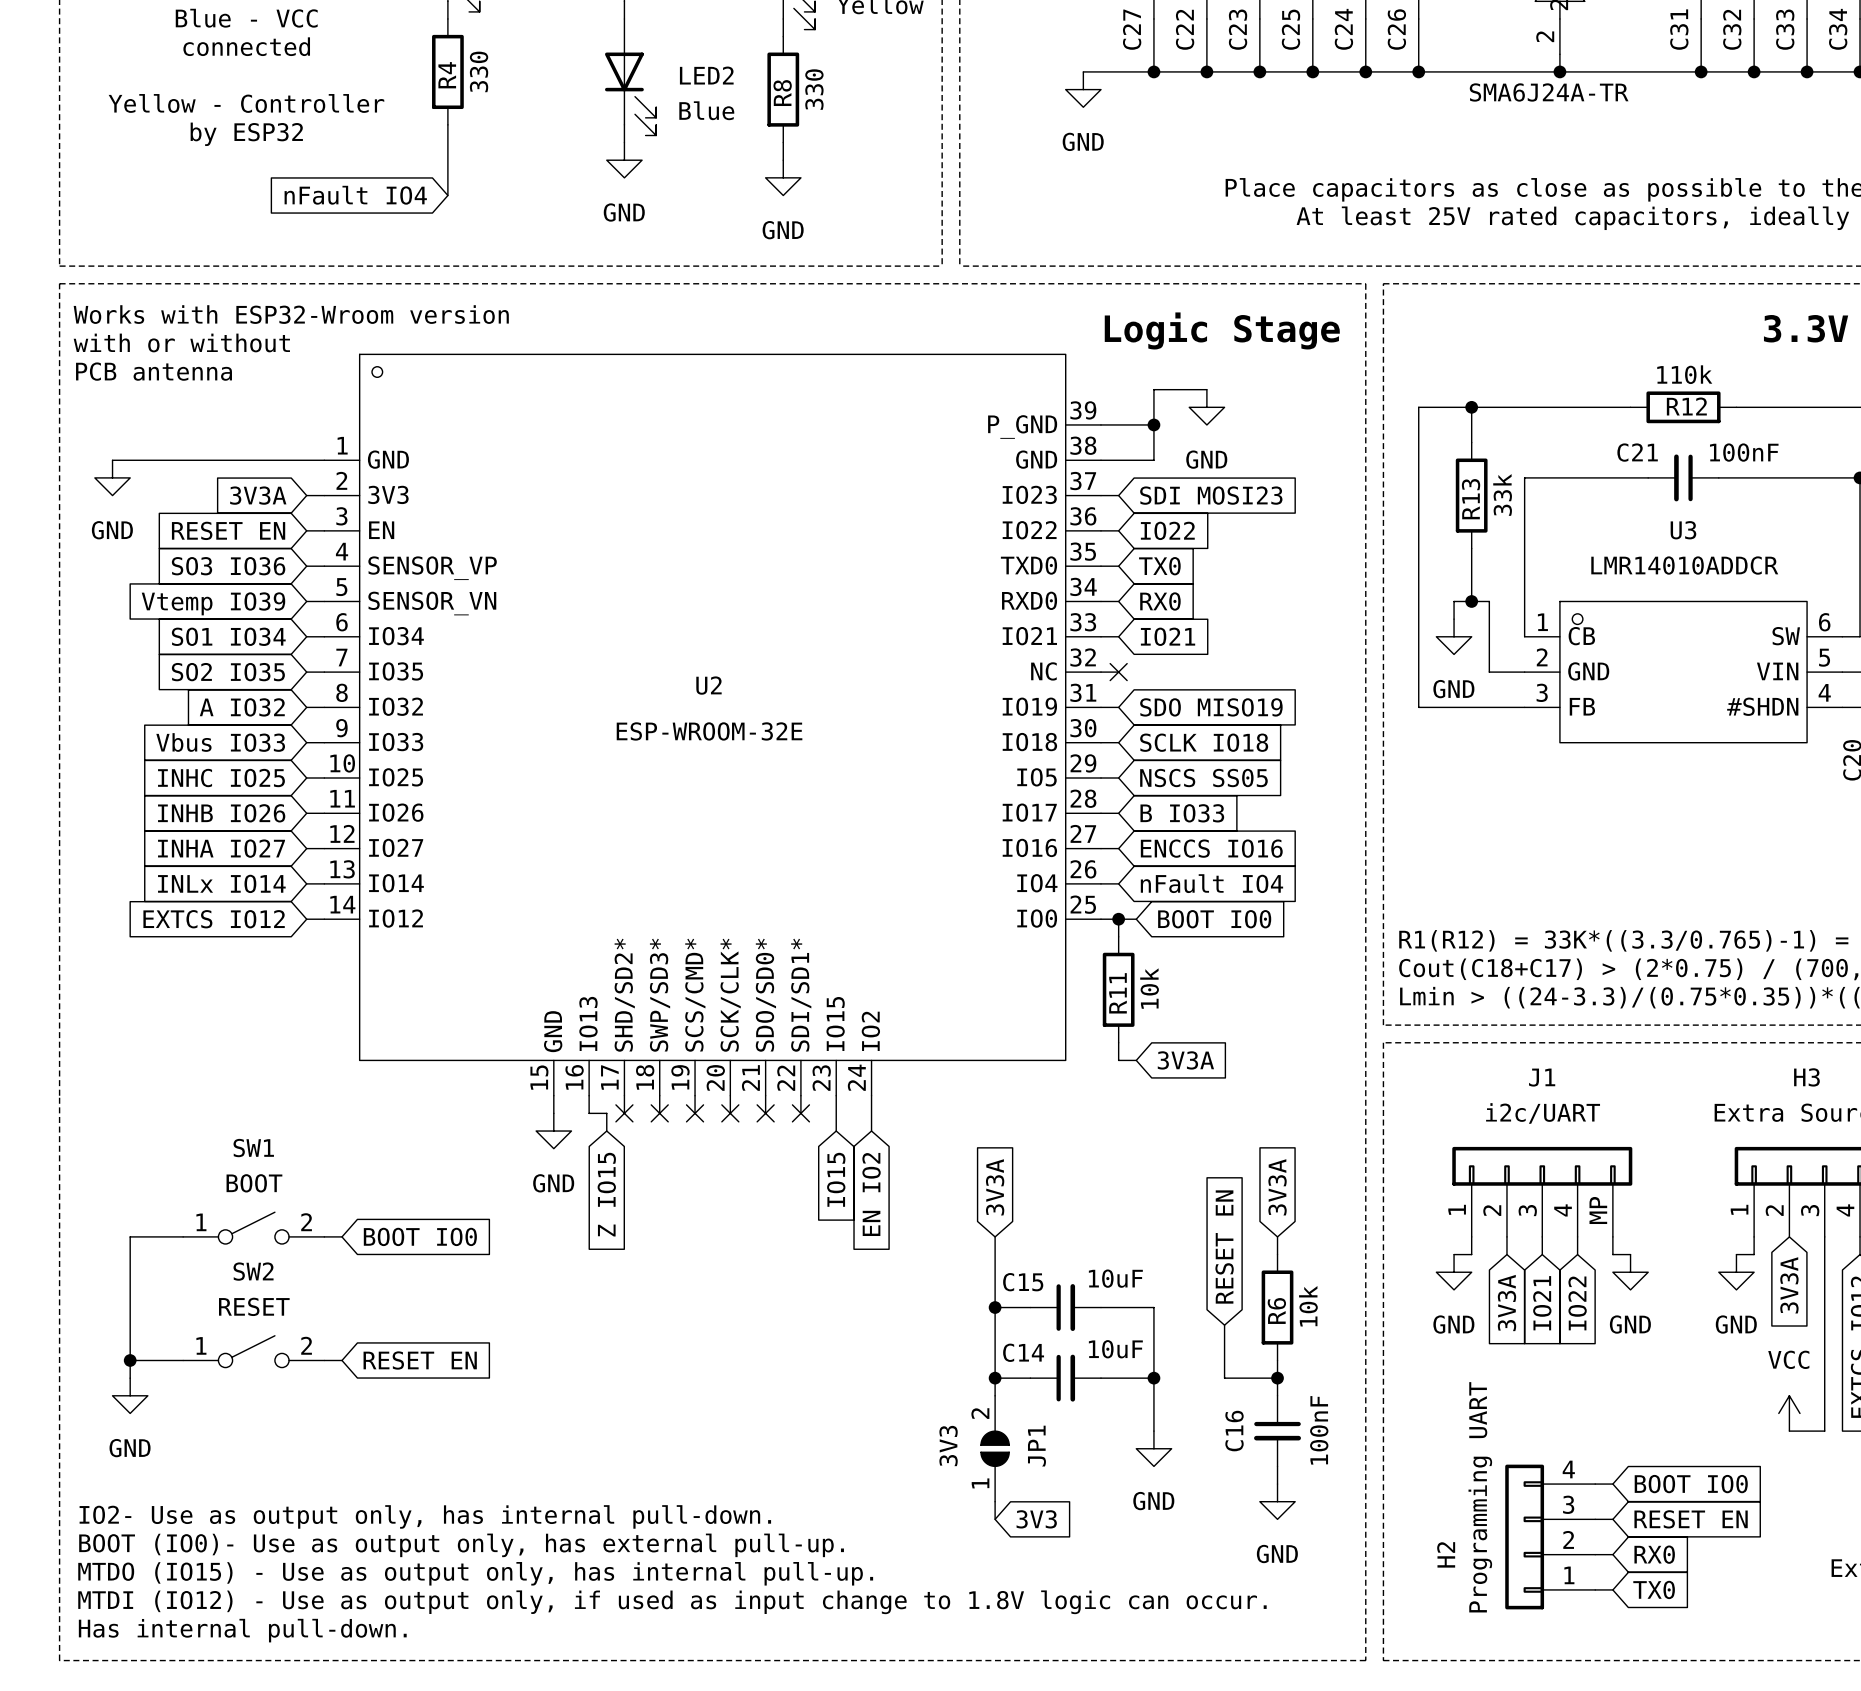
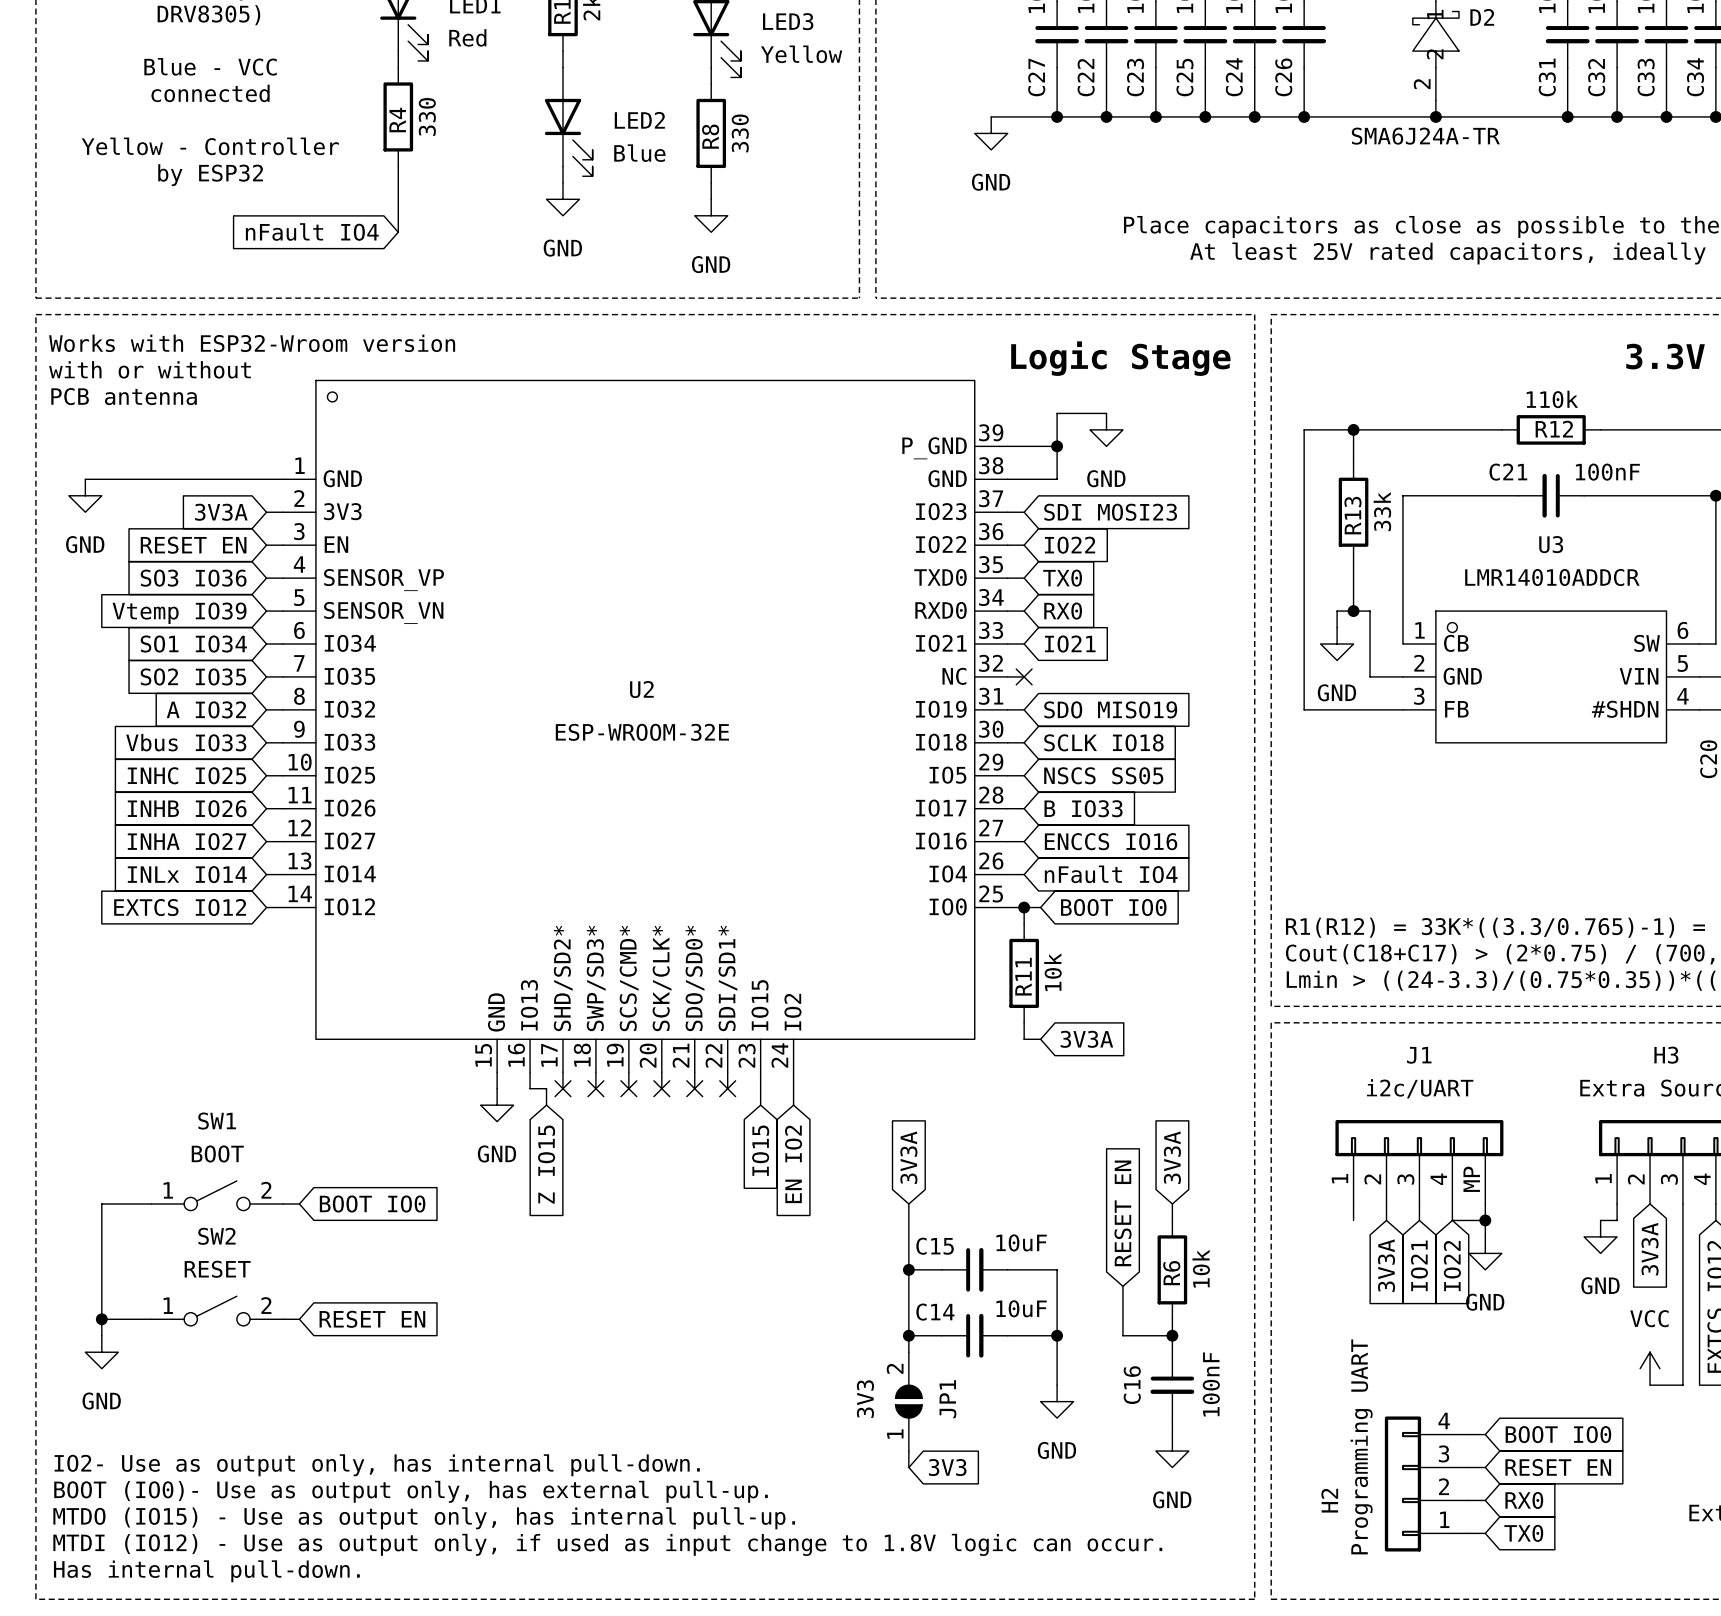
wire: (1454, 1254) (1471, 1254) -> none
wire: none -> (1452, 1220) (1485, 1220) (1485, 1236)
wire: (1612, 1254) (1630, 1254) -> none
junction: none -> (1485, 1220)
power symbol: GND (1454, 1272) -> none
power symbol position: GND (1630, 1272) -> GND (1485, 1253)

